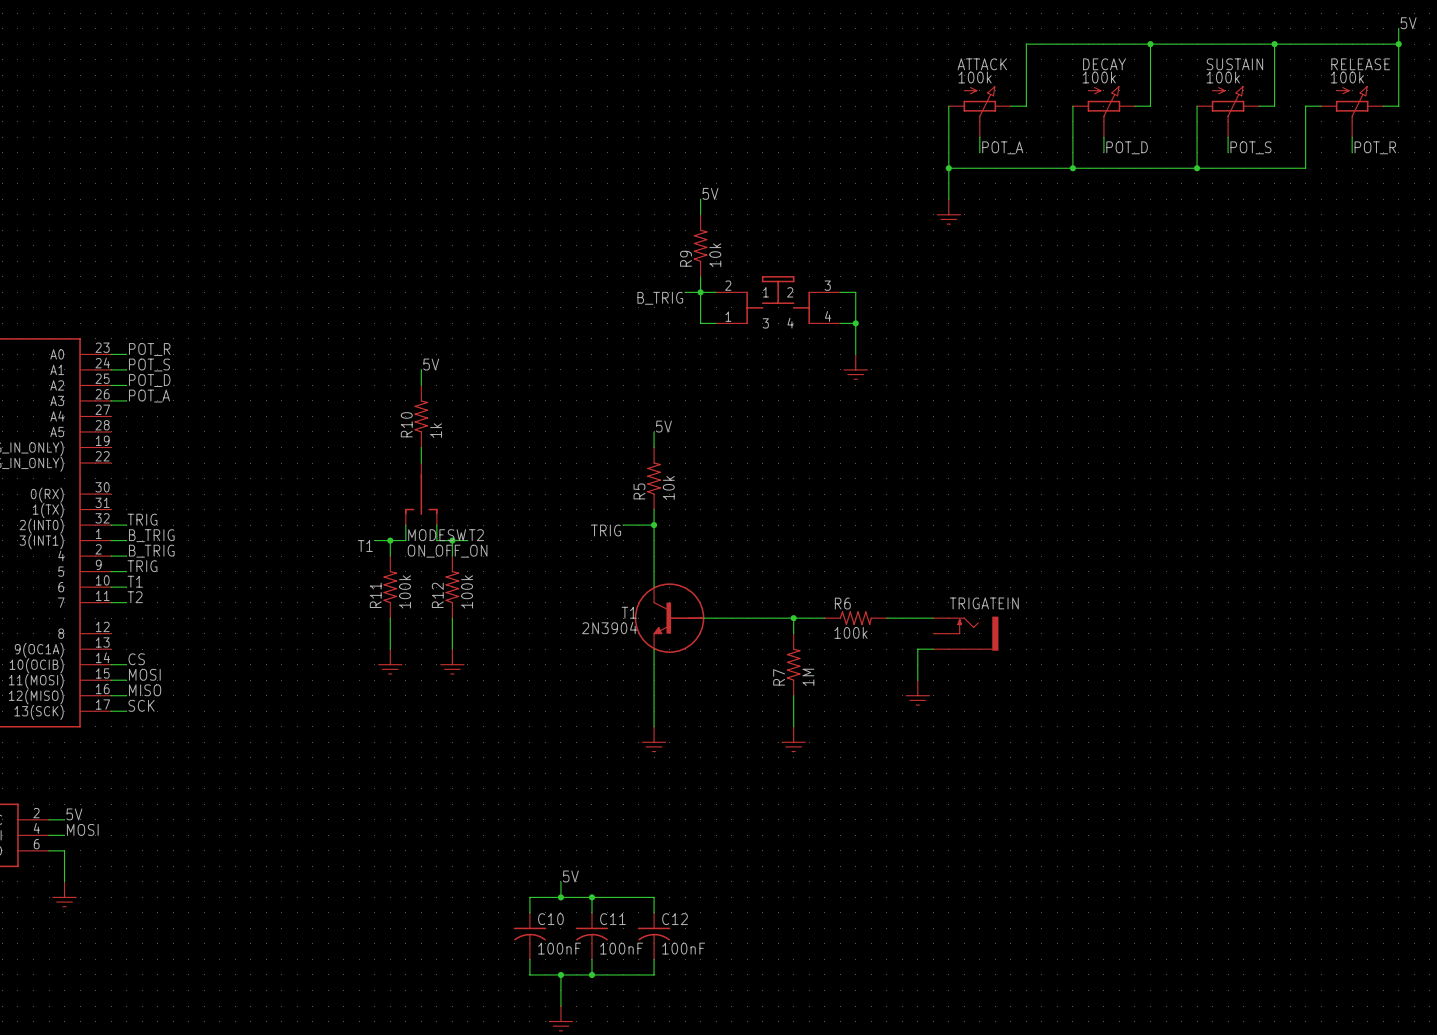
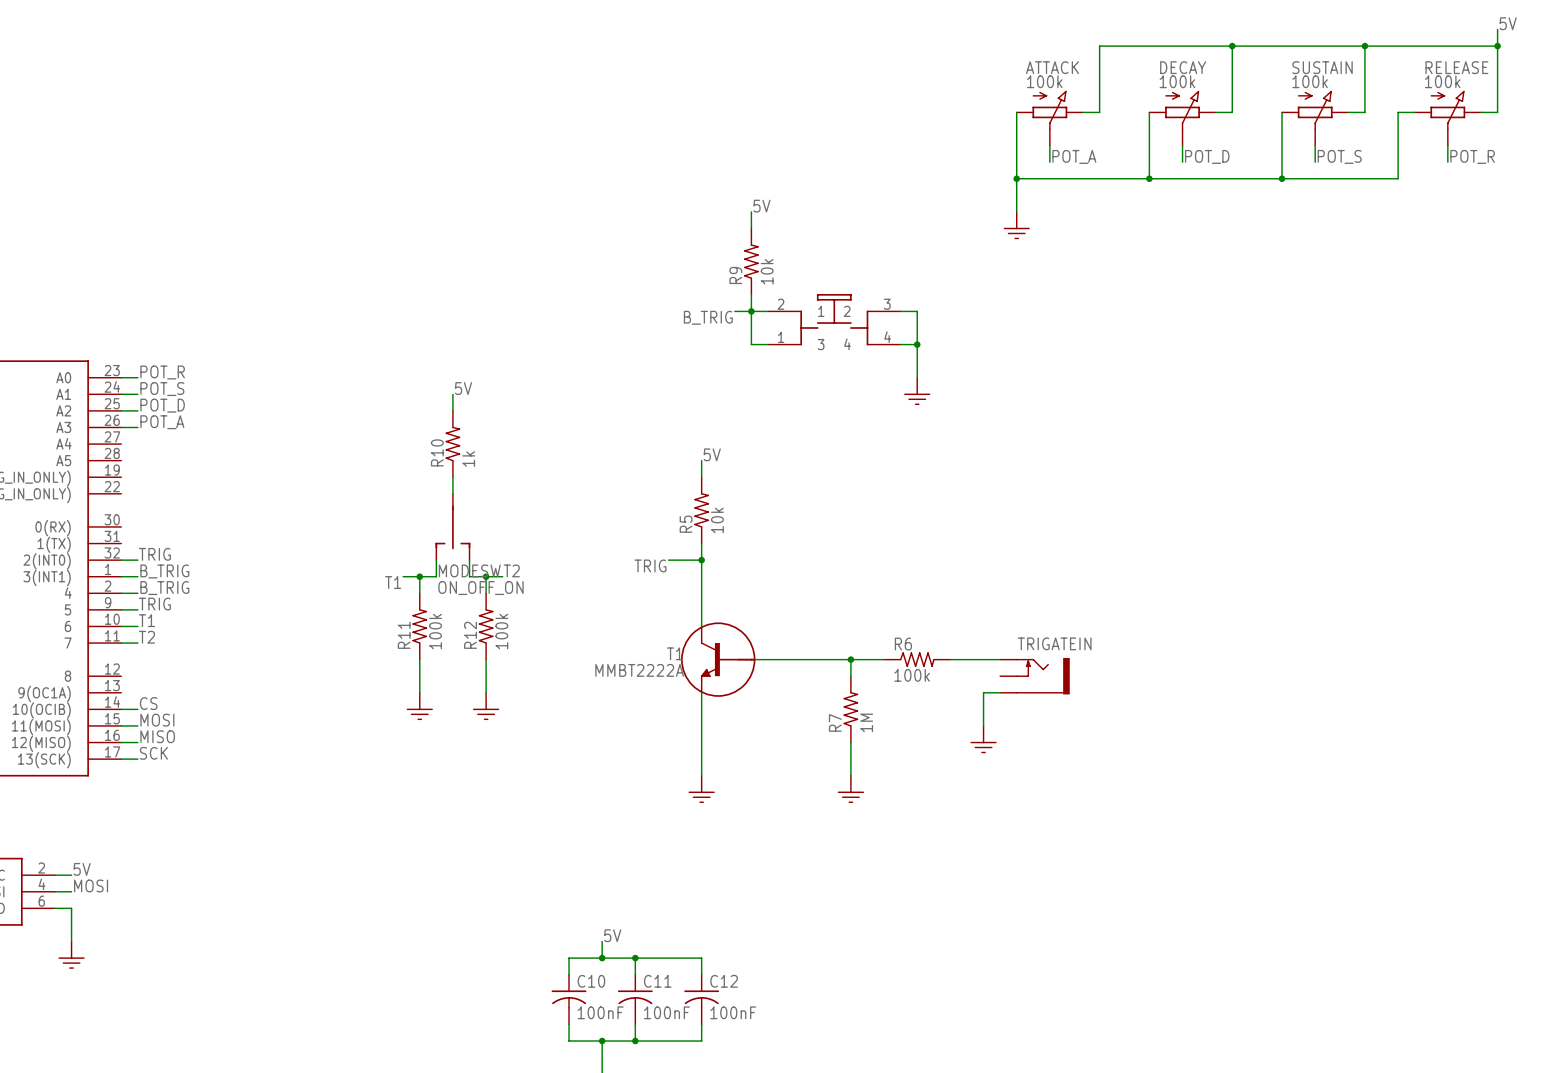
T1 value: 2N3904 (609, 627) -> MMBT2222A (639, 670)

